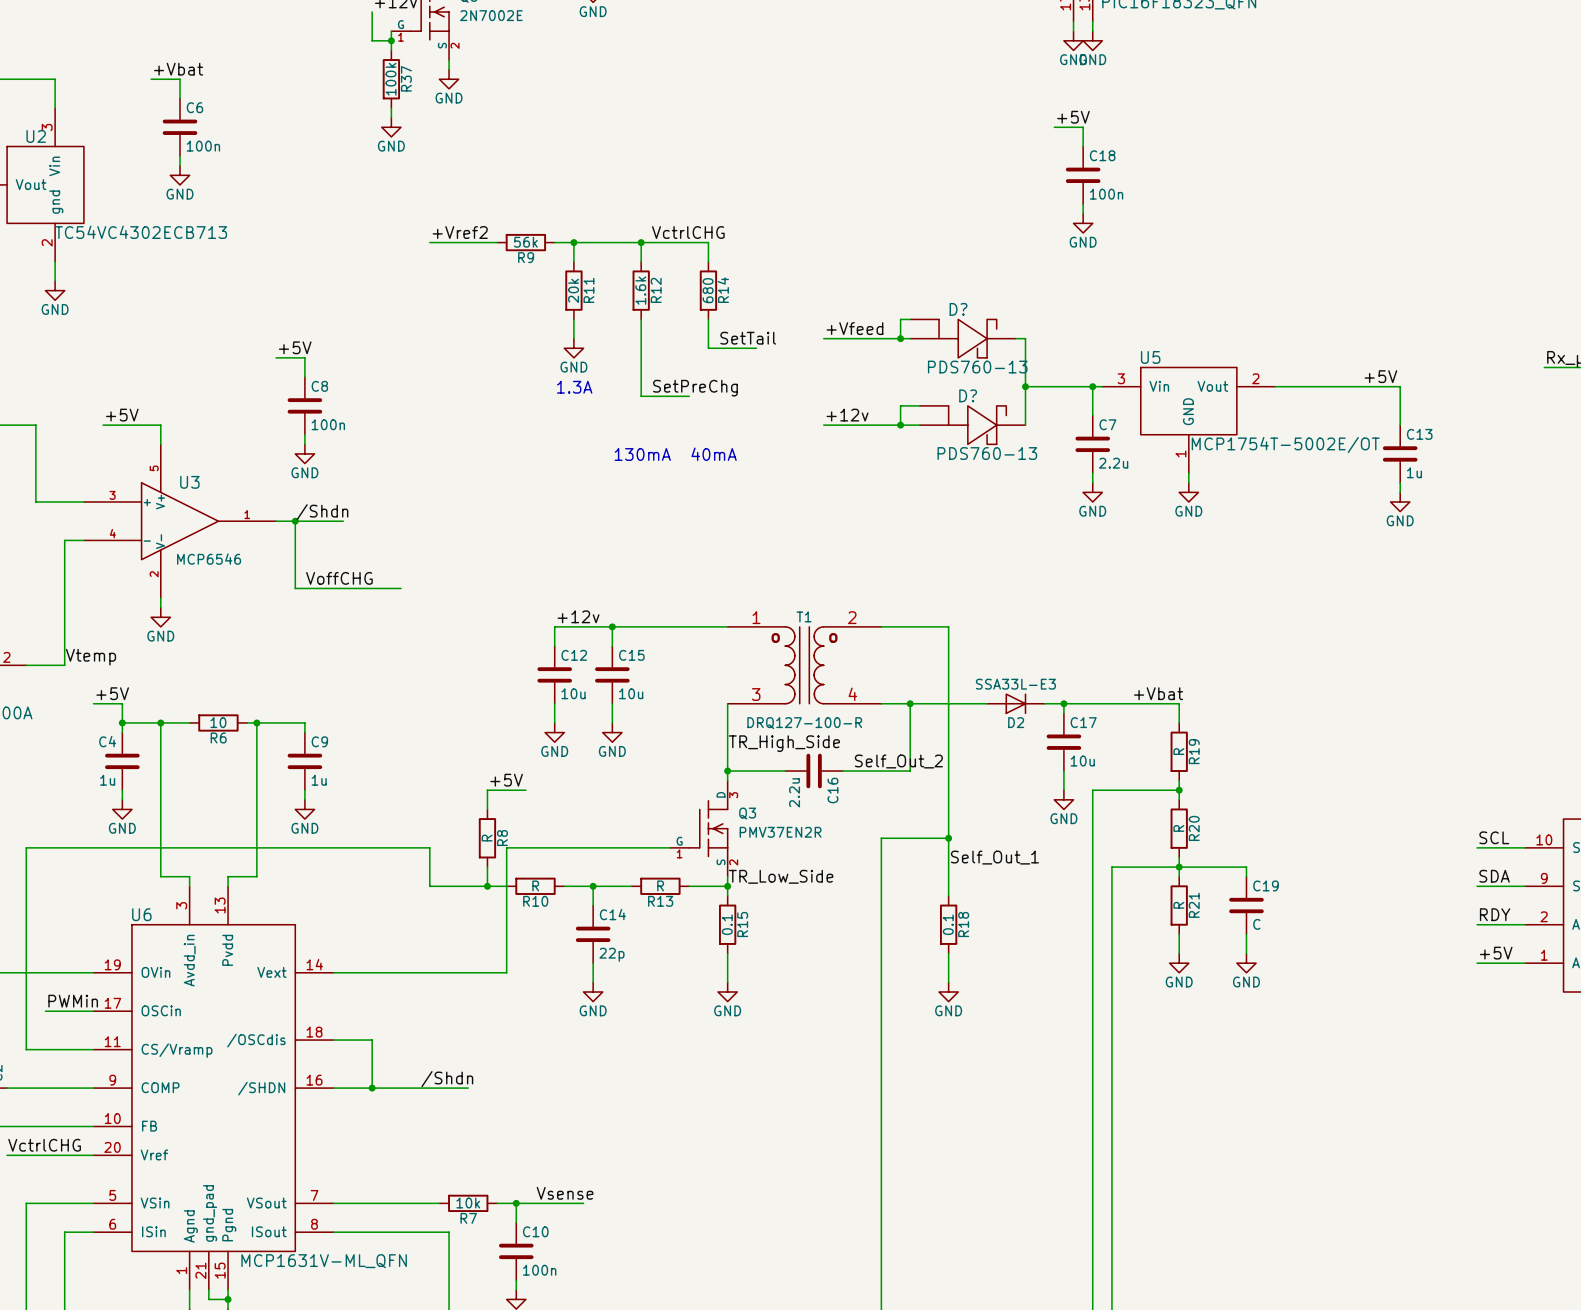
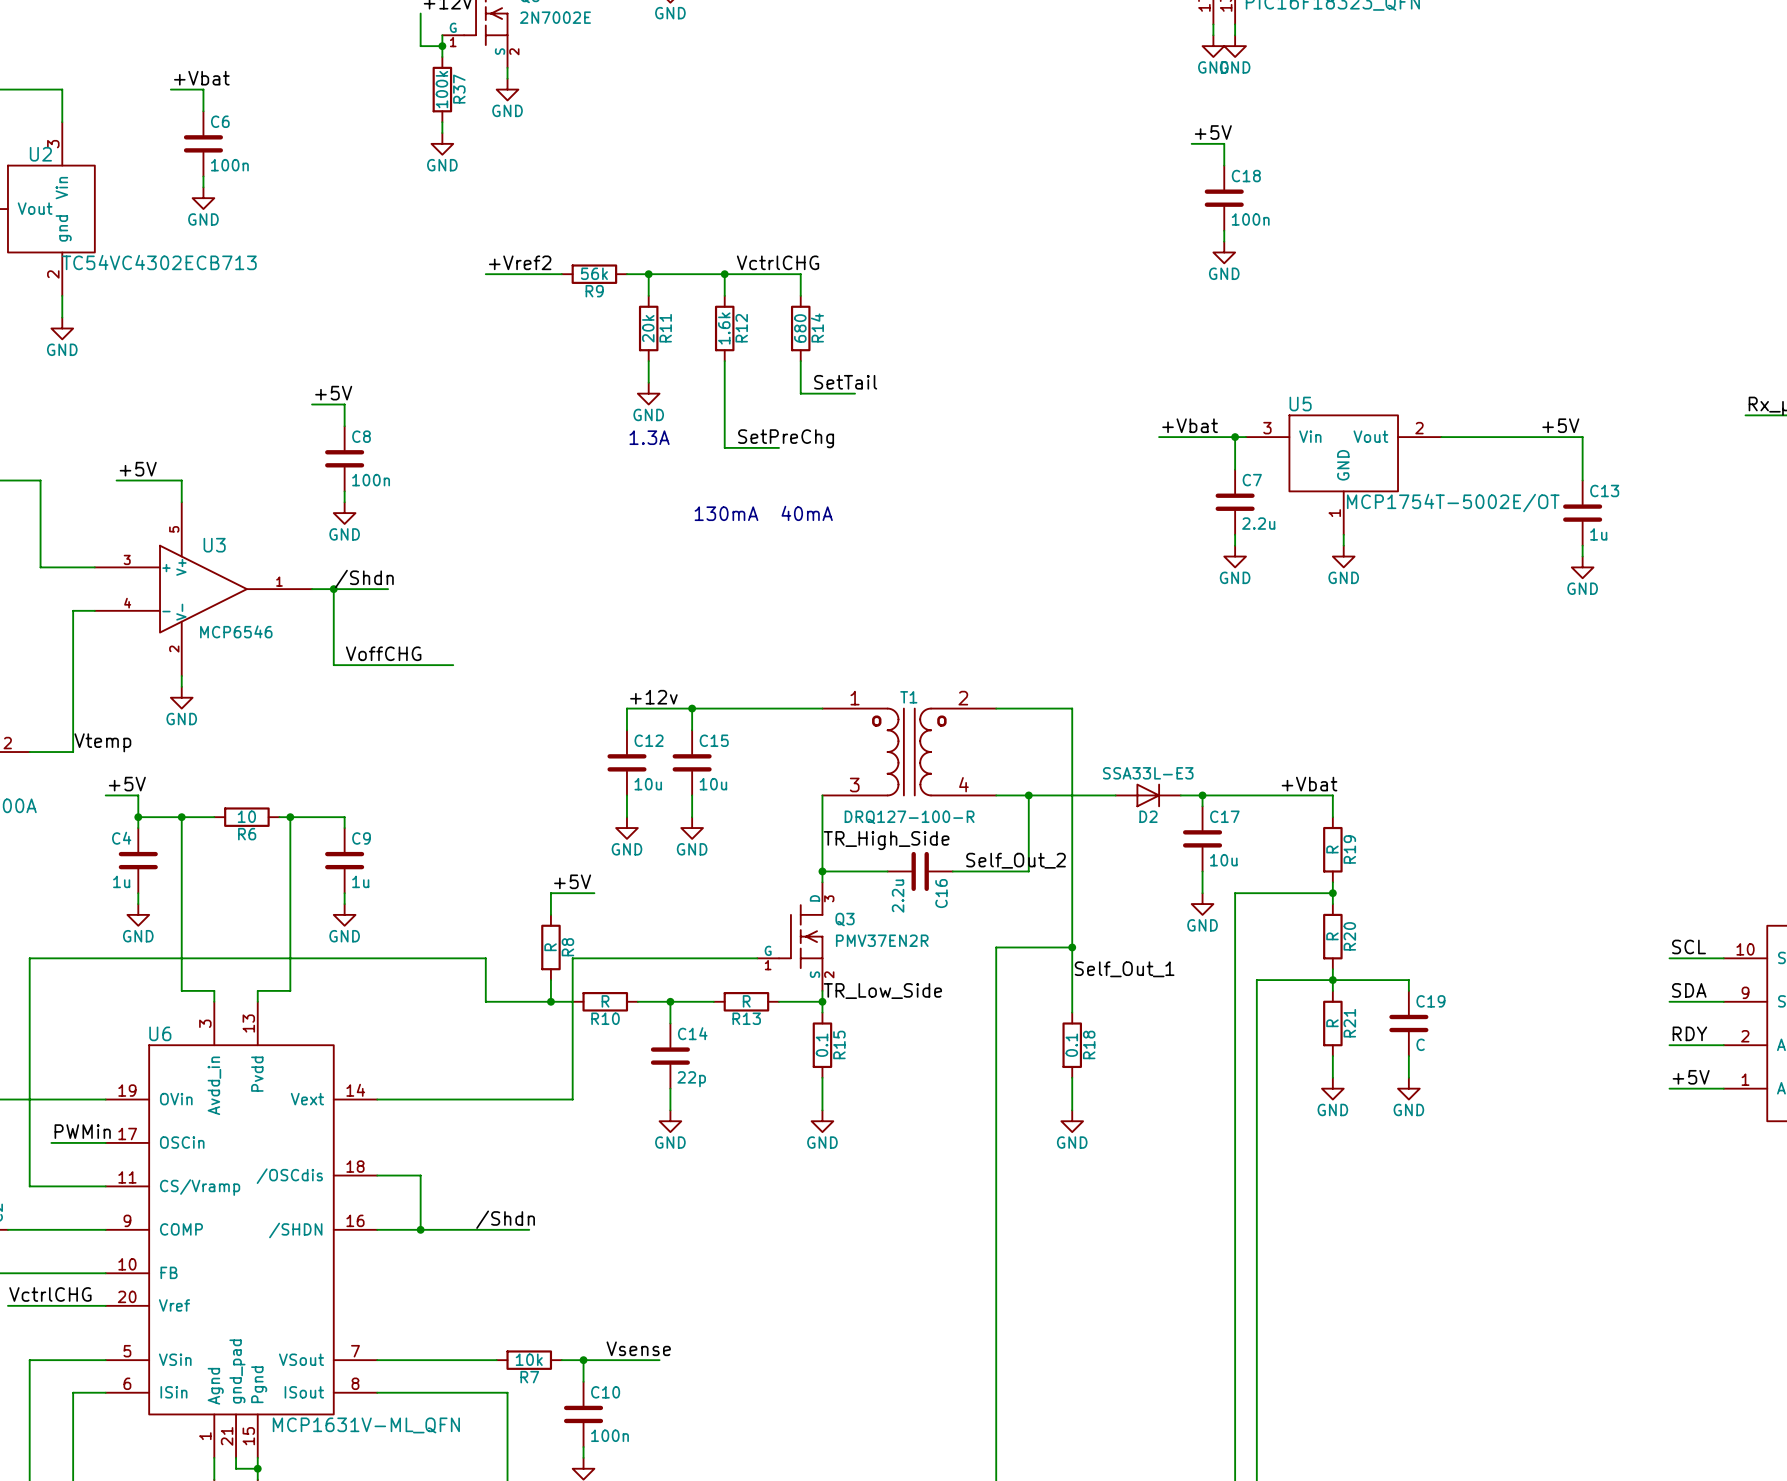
wire: (910, 319) (900, 319) (900, 338) -> none
label: +Vfeed (854, 328) -> none
wire: (823, 338) (910, 338) -> none
junction: (900, 338) -> none
D?: PDS760-13 (963, 338) -> none
wire: (1015, 338) (1025, 338) (1025, 425) -> none
label: none -> +Vbat (1190, 425)
junction: (1025, 386) -> none
wire: (919, 405) (900, 405) (900, 425) -> none
label: +12v (847, 415) -> none
wire: (823, 425) (919, 425) -> none
junction: (900, 425) -> none
D?: PDS760-13 (972, 425) -> none

